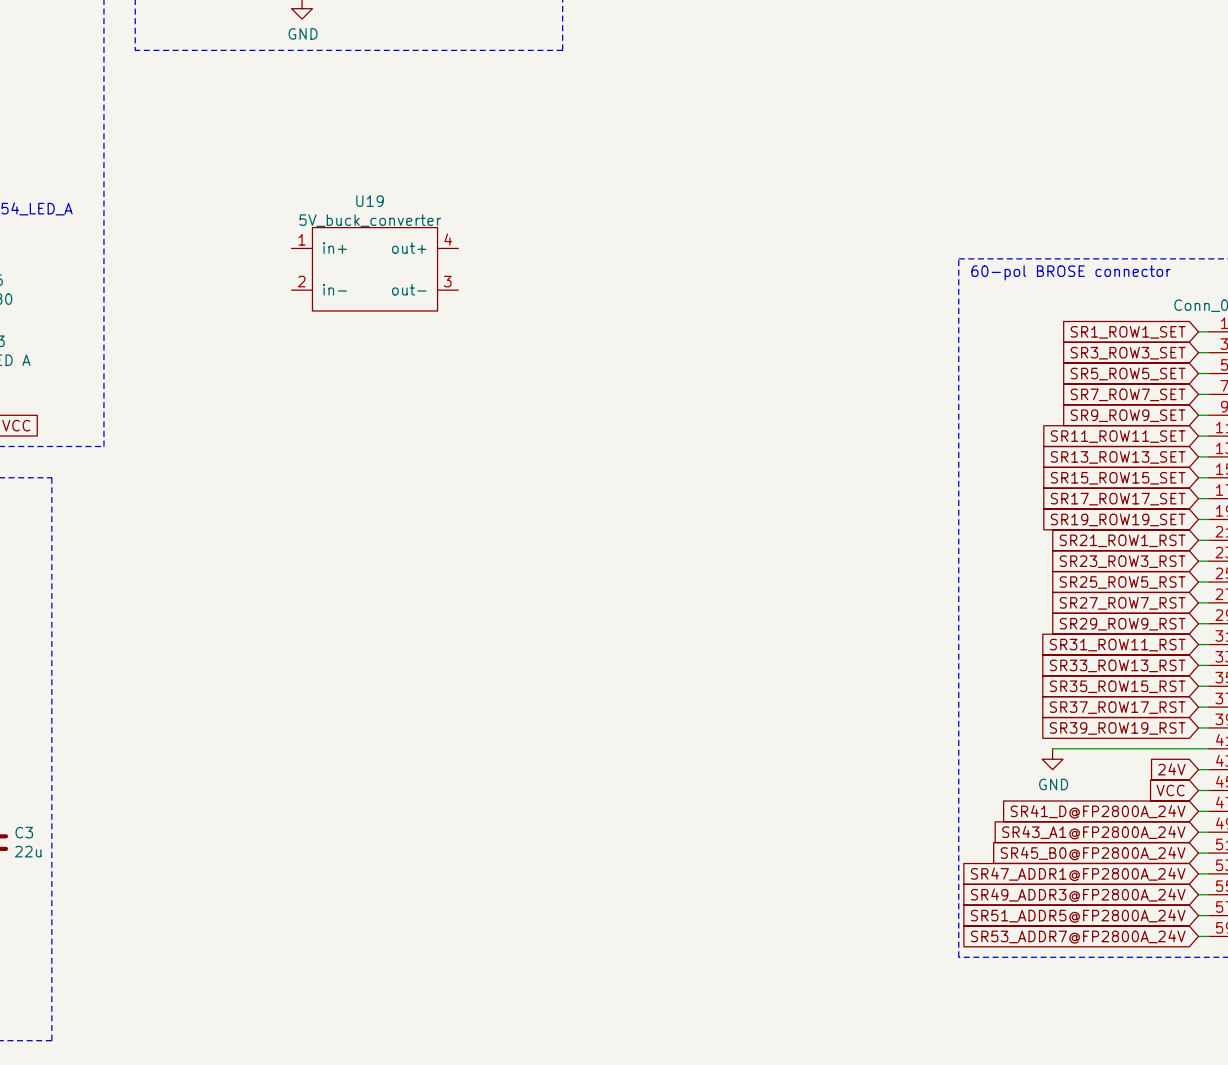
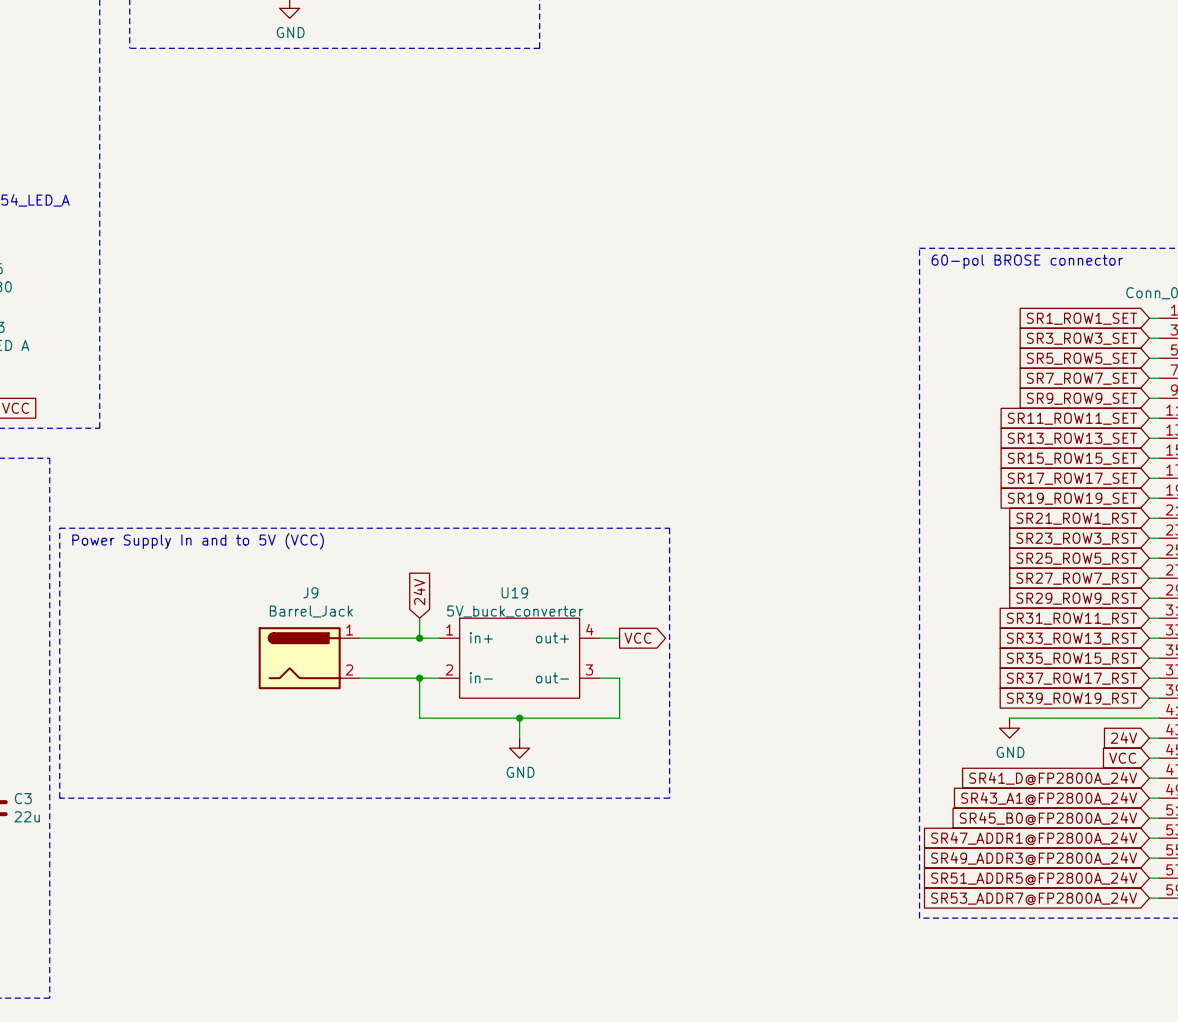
U19 position: (374, 269) -> (519, 658)
line: none -> (59, 528) (669, 528) (669, 798) (59, 798) (59, 528)
text: none -> Power Supply In and to 5V (VCC) (198, 541)
global label: none -> 24V (419, 592)
wire: none -> (419, 618) (419, 638)
wire: none -> (359, 638) (439, 638)
junction: none -> (419, 638)
wire: none -> (599, 638) (619, 638)
global label: none -> VCC (637, 638)
J9: none -> Barrel_Jack (309, 658)
wire: none -> (359, 678) (439, 678)
wire: none -> (419, 678) (419, 718) (619, 718) (619, 678) (599, 678)
junction: none -> (419, 678)
wire: none -> (519, 718) (519, 738)
junction: none -> (519, 718)
power symbol: none -> GND (519, 748)

